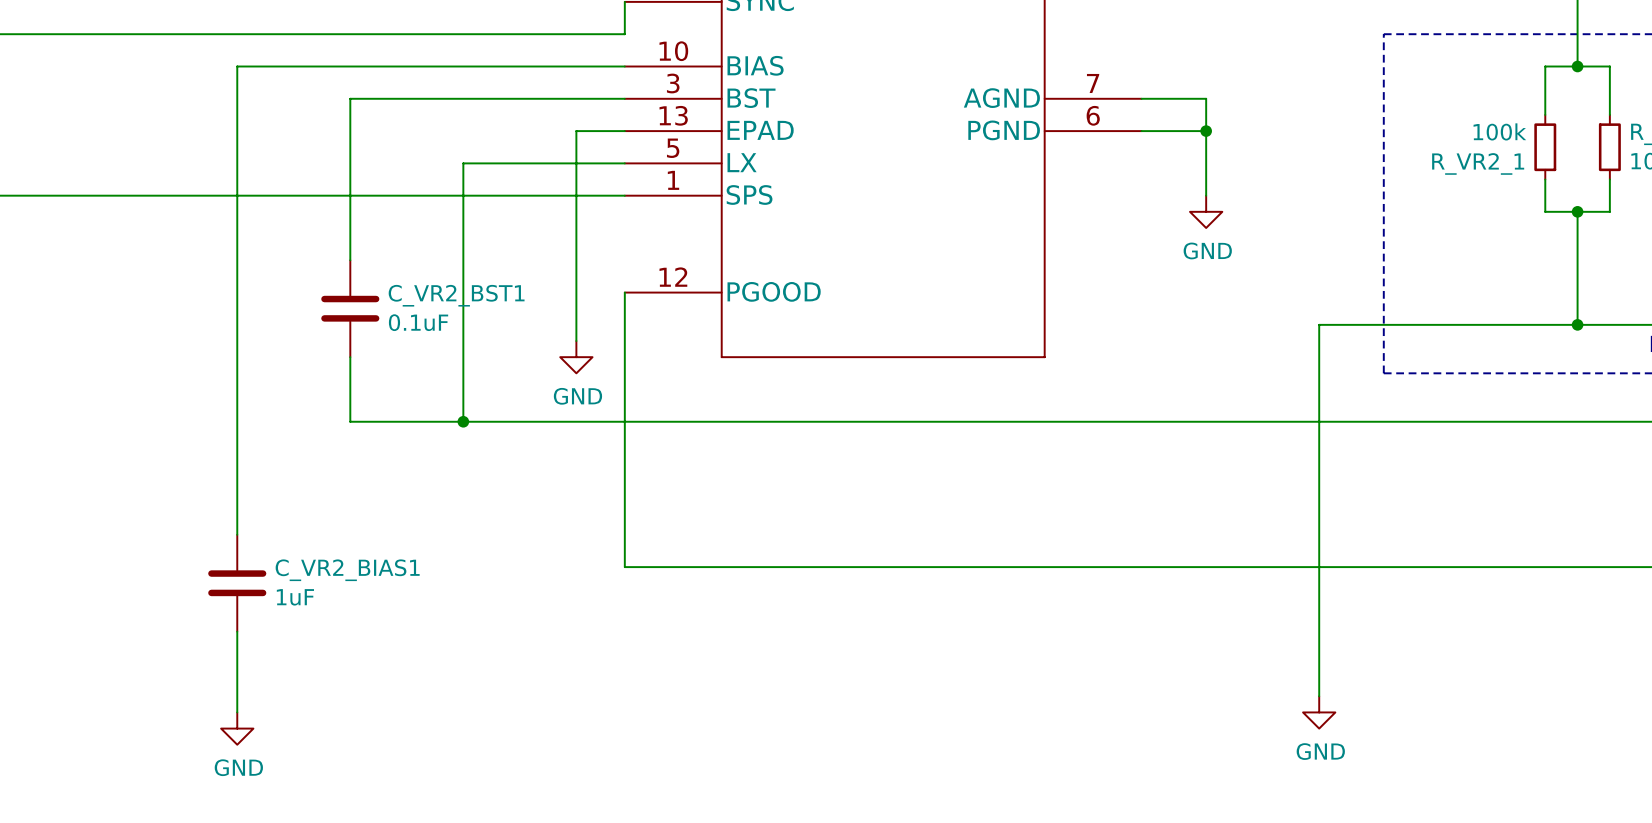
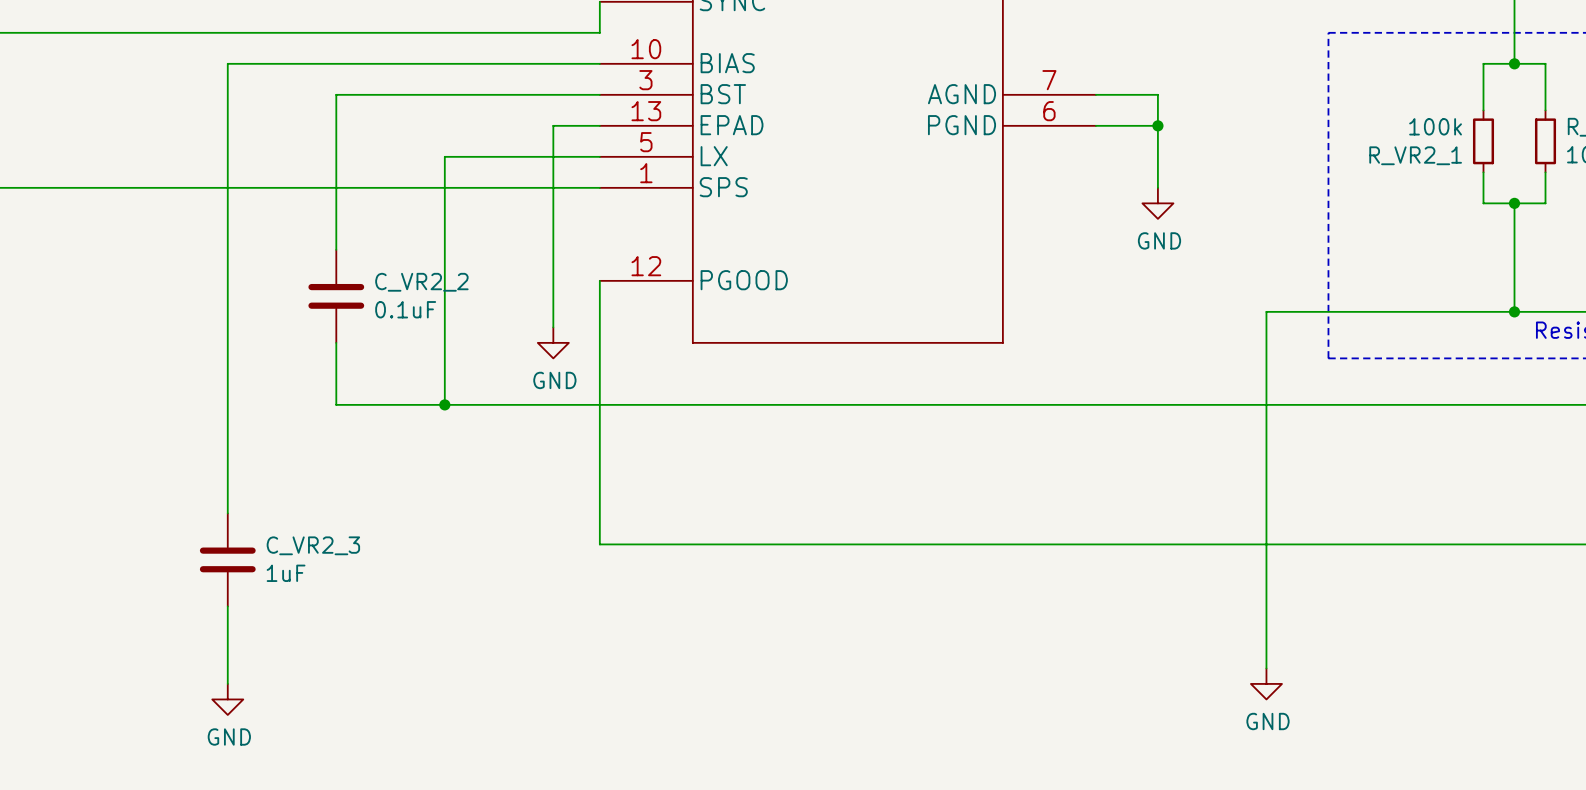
C_VR2_BST1 name: C_VR2_BST1 (456, 295) -> C_VR2_2 (421, 282)
C_VR2_BIAS1 name: C_VR2_BIAS1 (347, 570) -> C_VR2_3 (313, 545)

